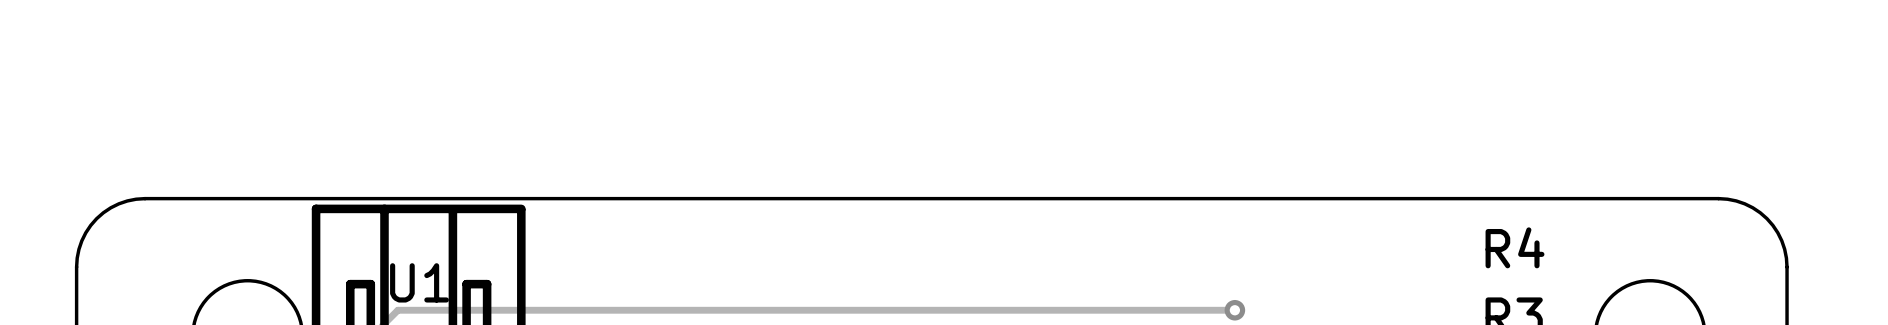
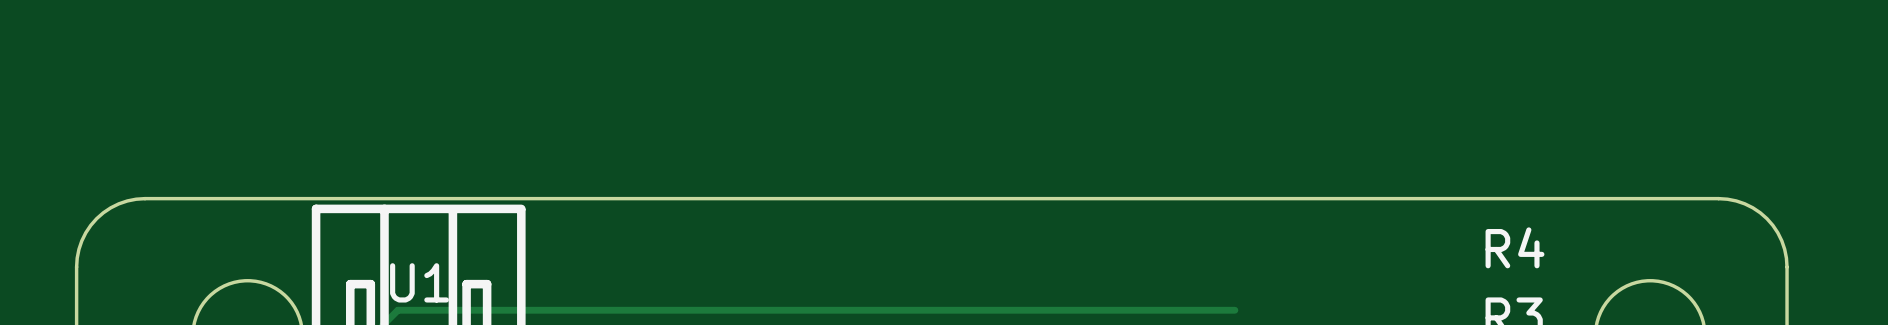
via: (1234, 310) -> none

